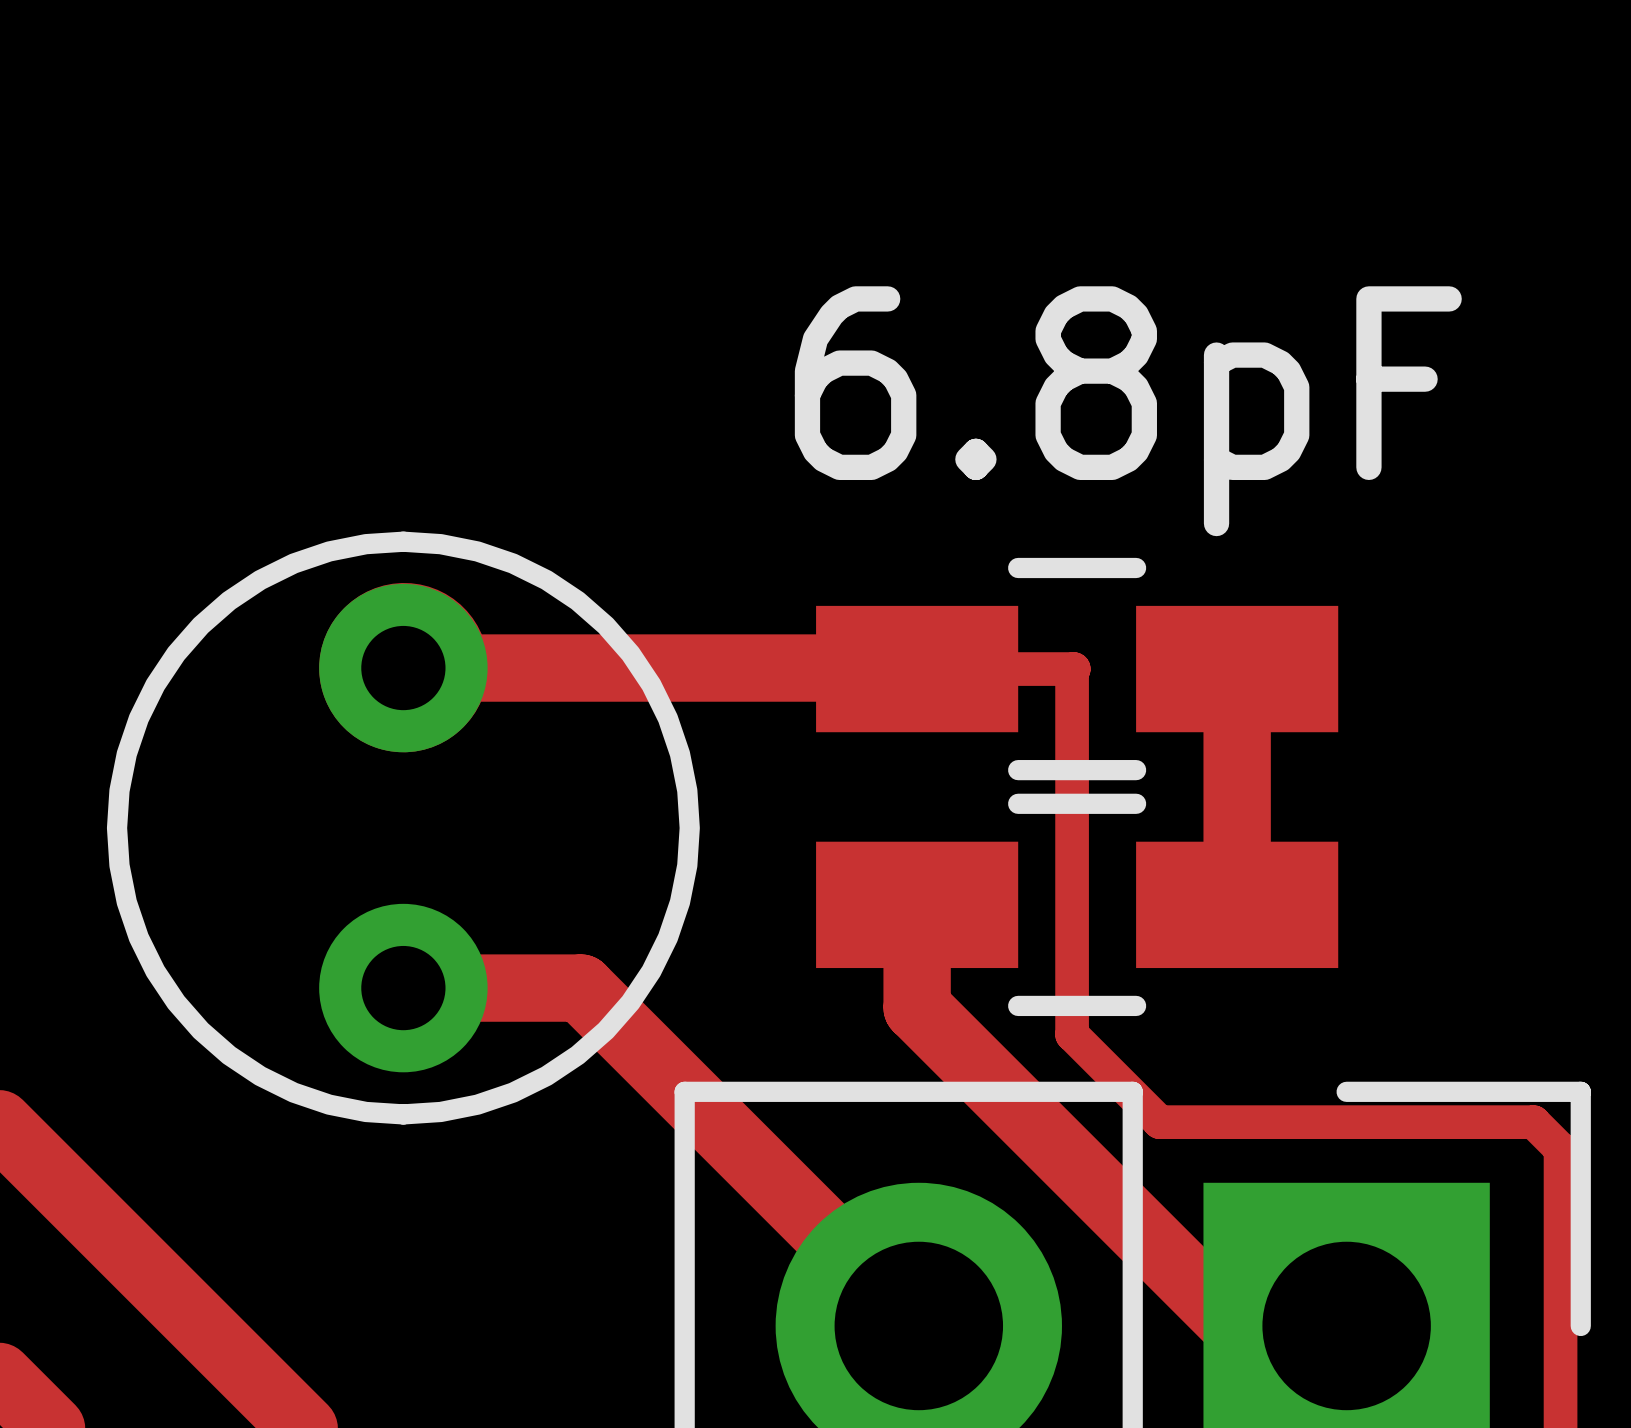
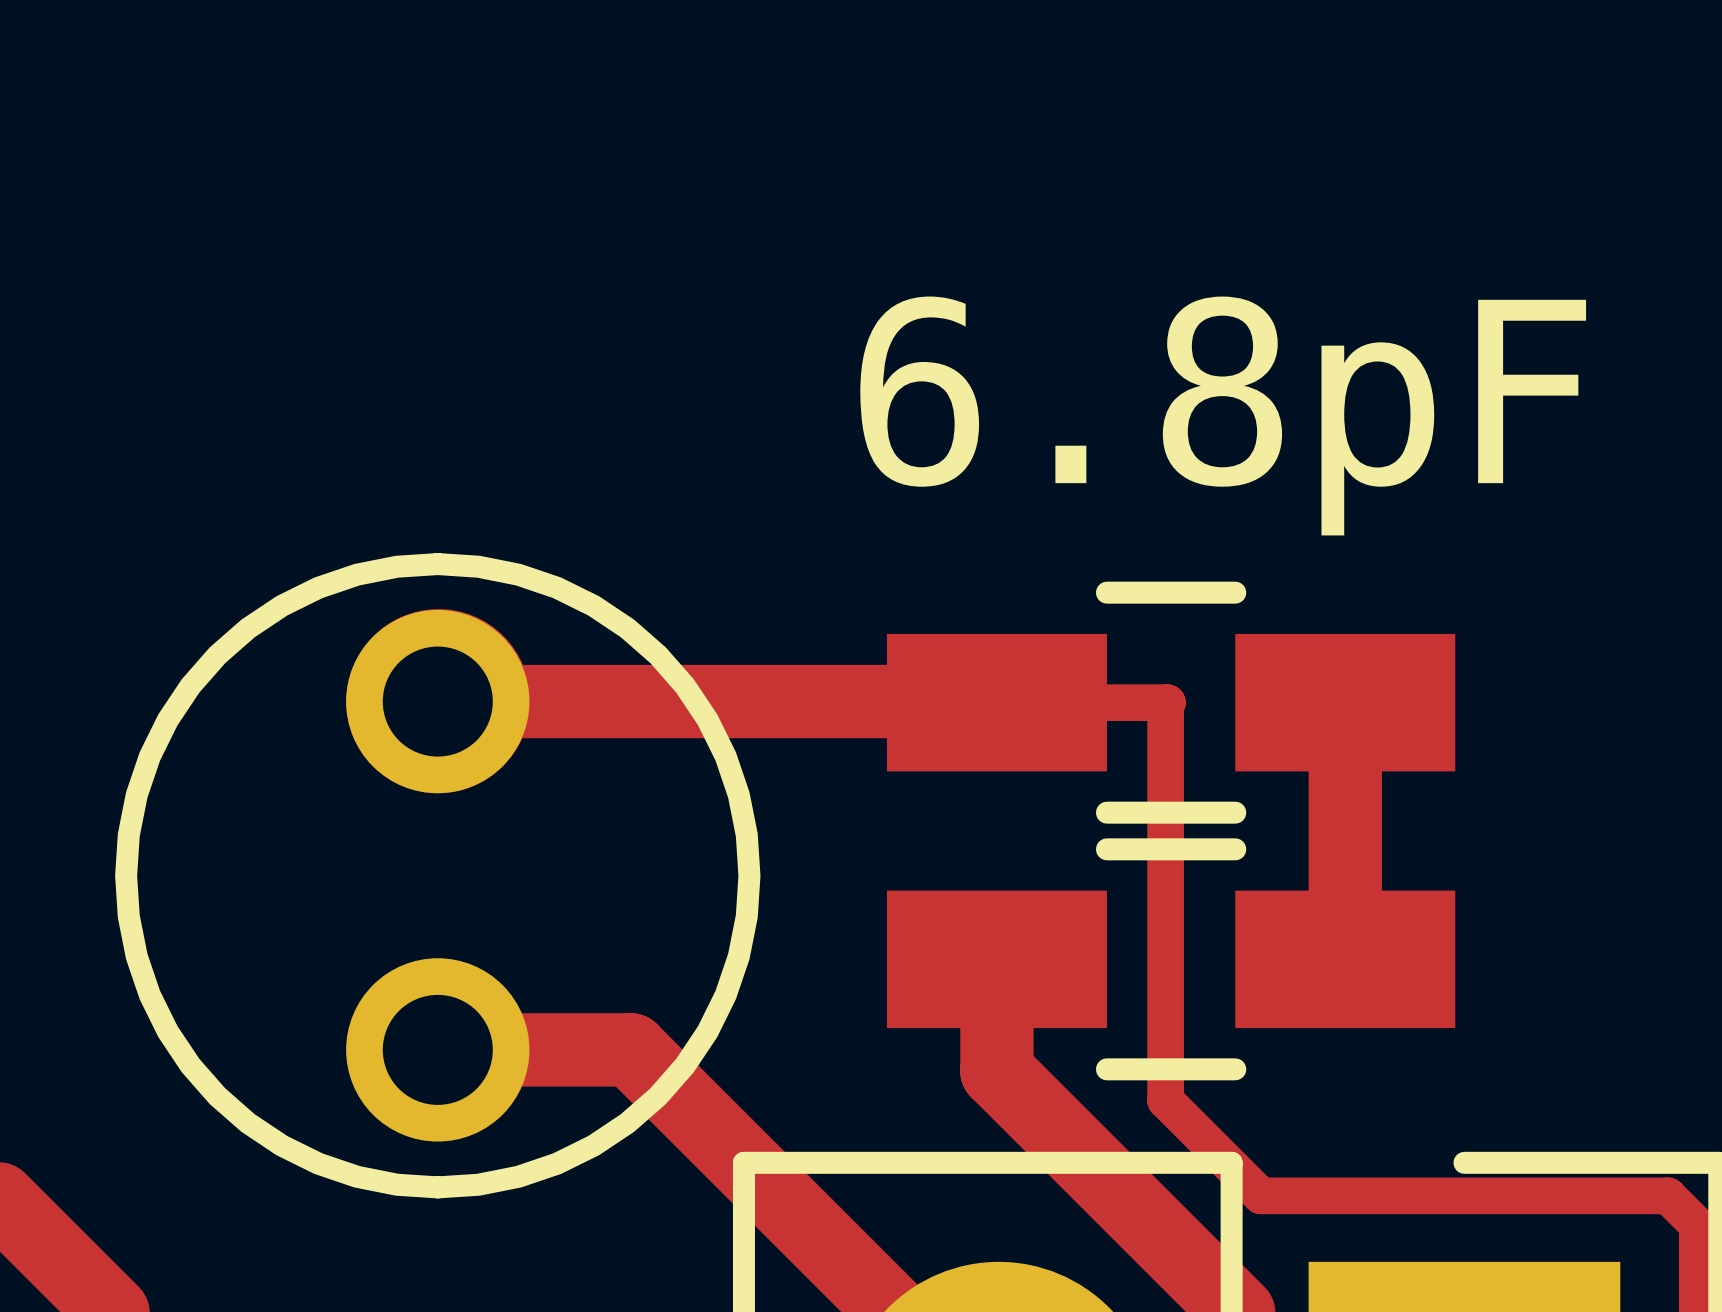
part footprint: [106, 531, 700, 1125] -> [115, 553, 761, 1199]

